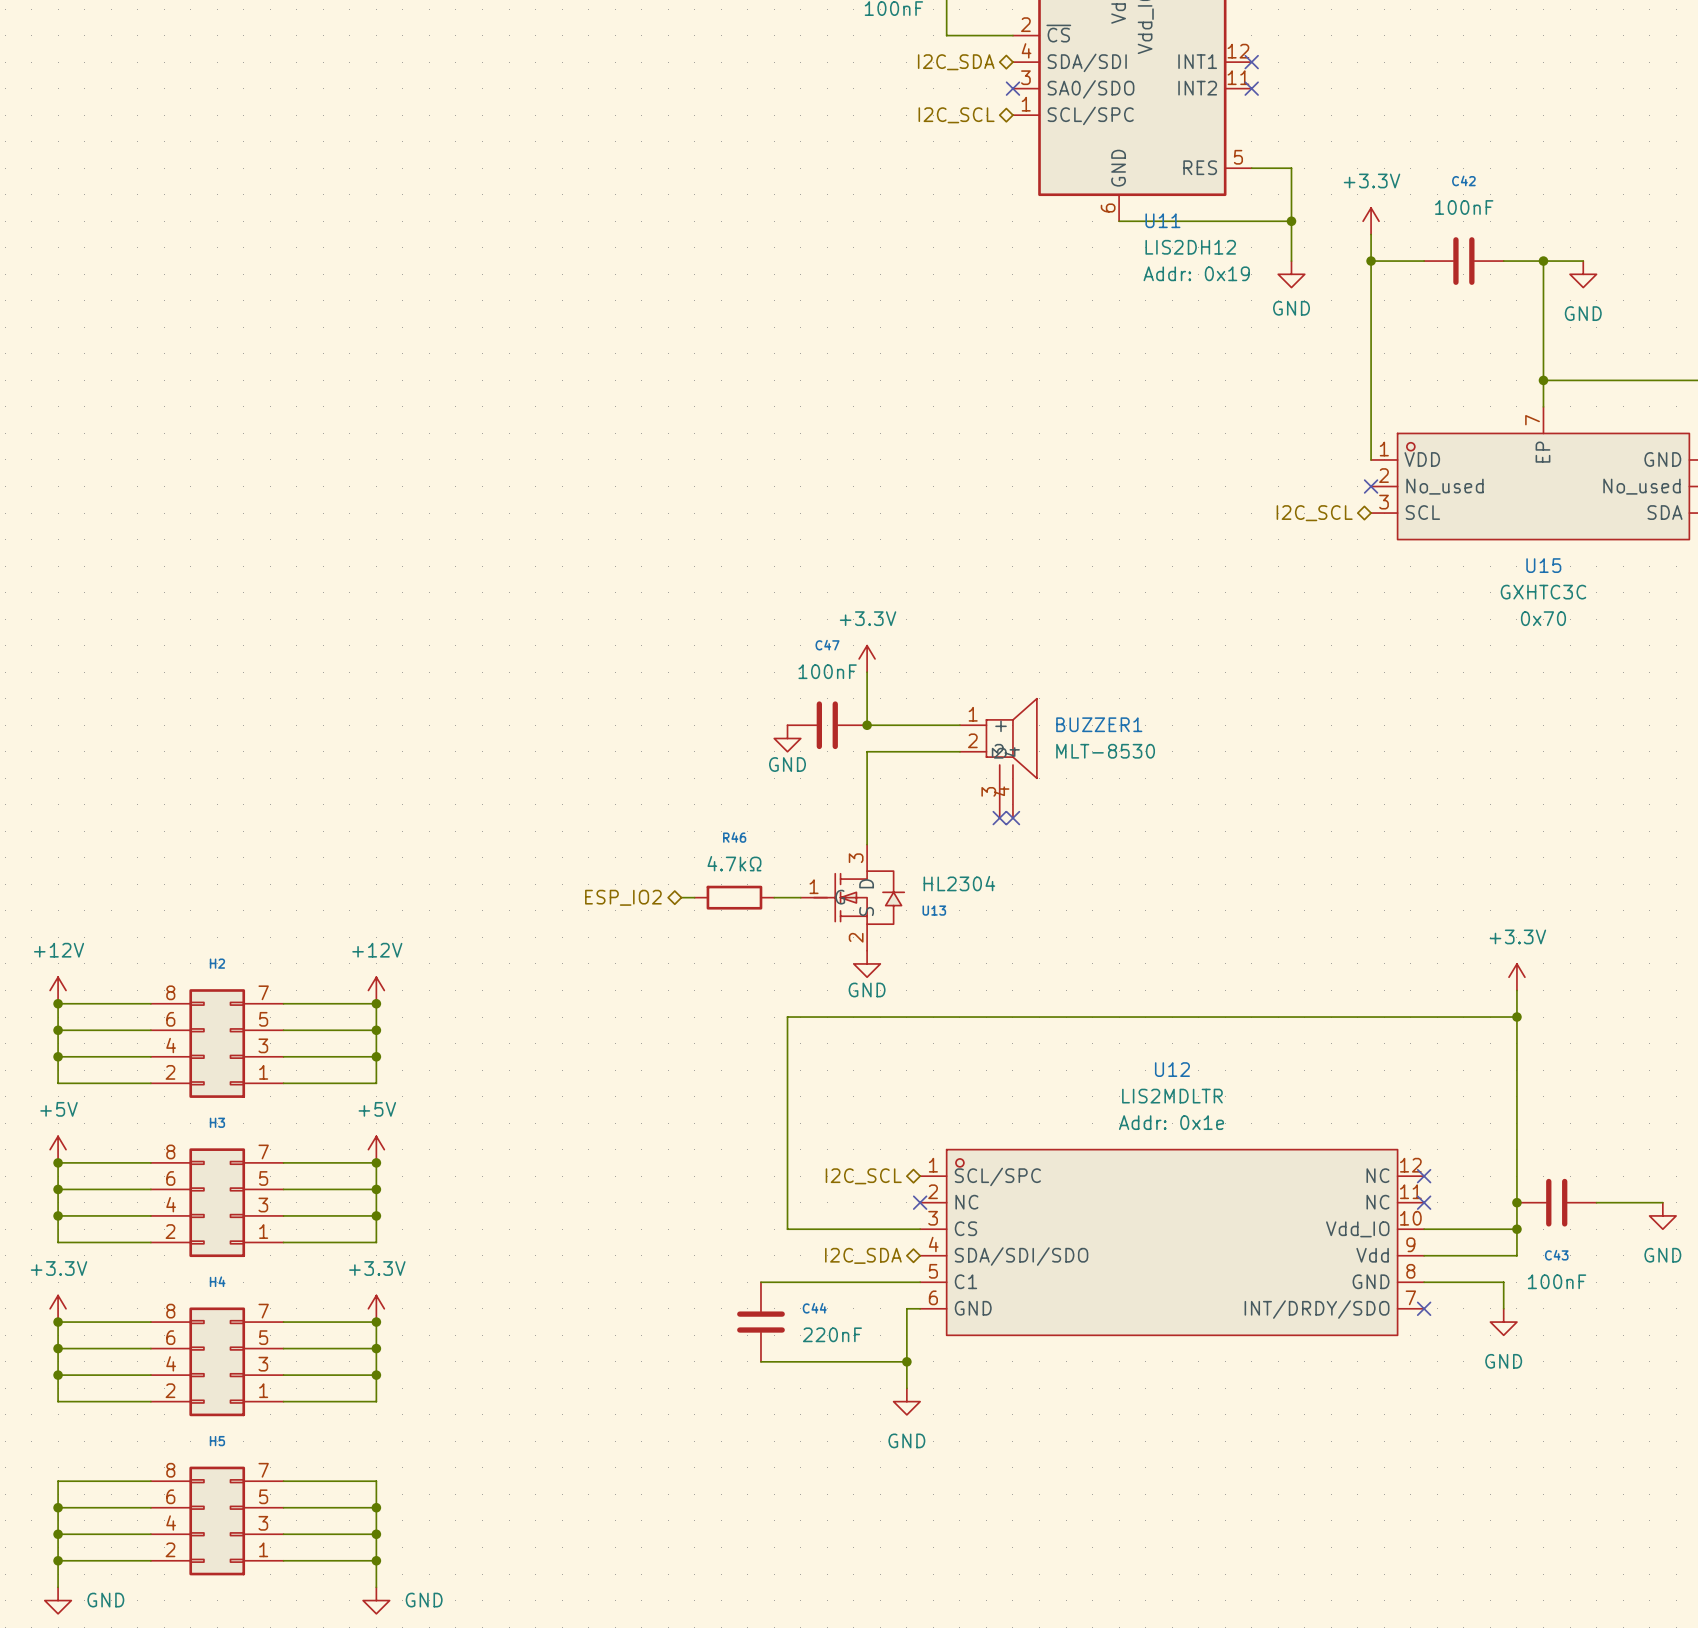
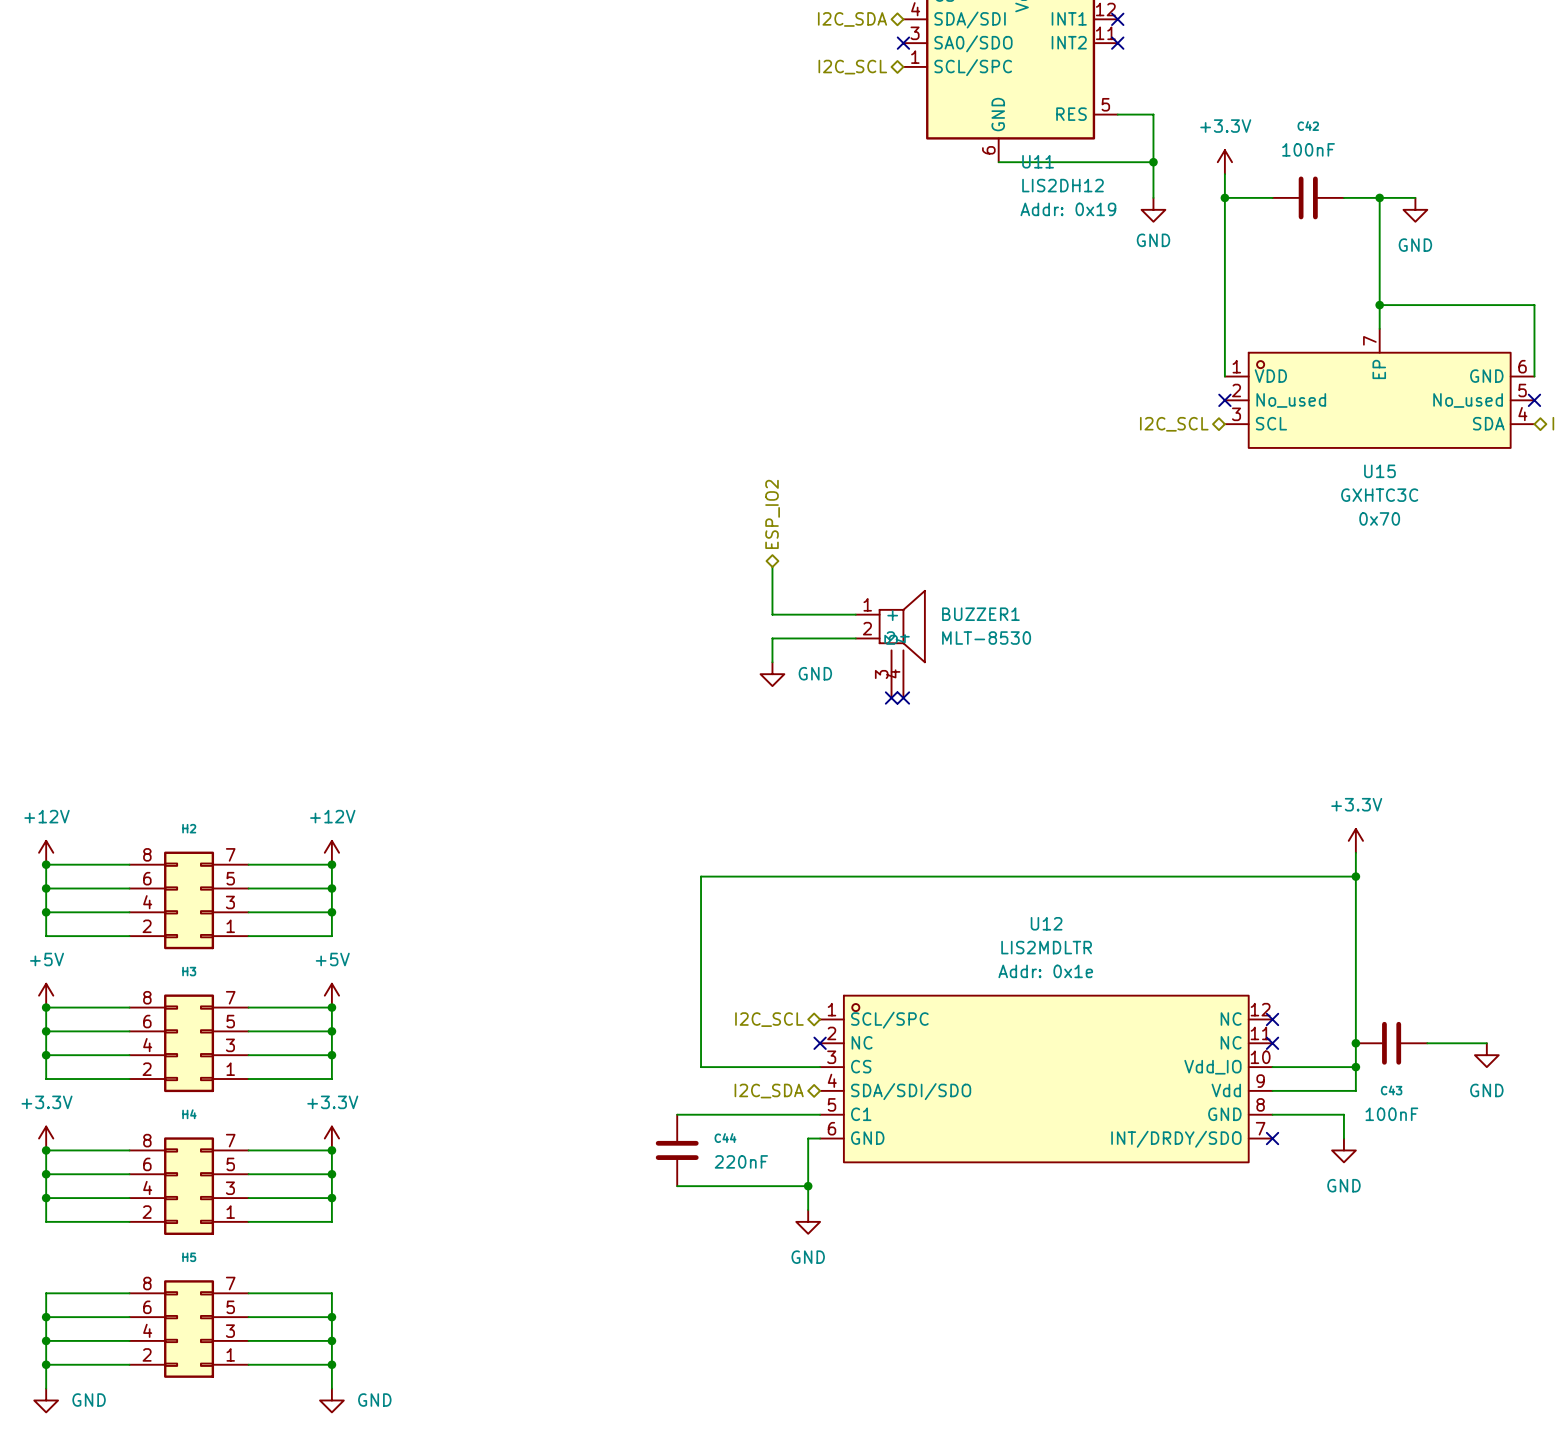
hierarchical label: none -> ESP_IO2 (772, 514)
power symbol: +3.3V (867, 658) -> none
C47: 100nF (827, 725) -> none
junction: (867, 725) -> none
power symbol: GND (787, 738) -> none
wire: (867, 778) (867, 844) -> none
power symbol: none -> GND (772, 674)
hierarchical label: ESP_IO2 (623, 897) -> none
wire: (681, 897) (694, 897) -> none
R46: 4.7kΩ (734, 897) -> none
wire: (774, 897) (800, 897) -> none
U13: HL2304 (852, 897) -> none
power symbol: GND (867, 963) -> none

